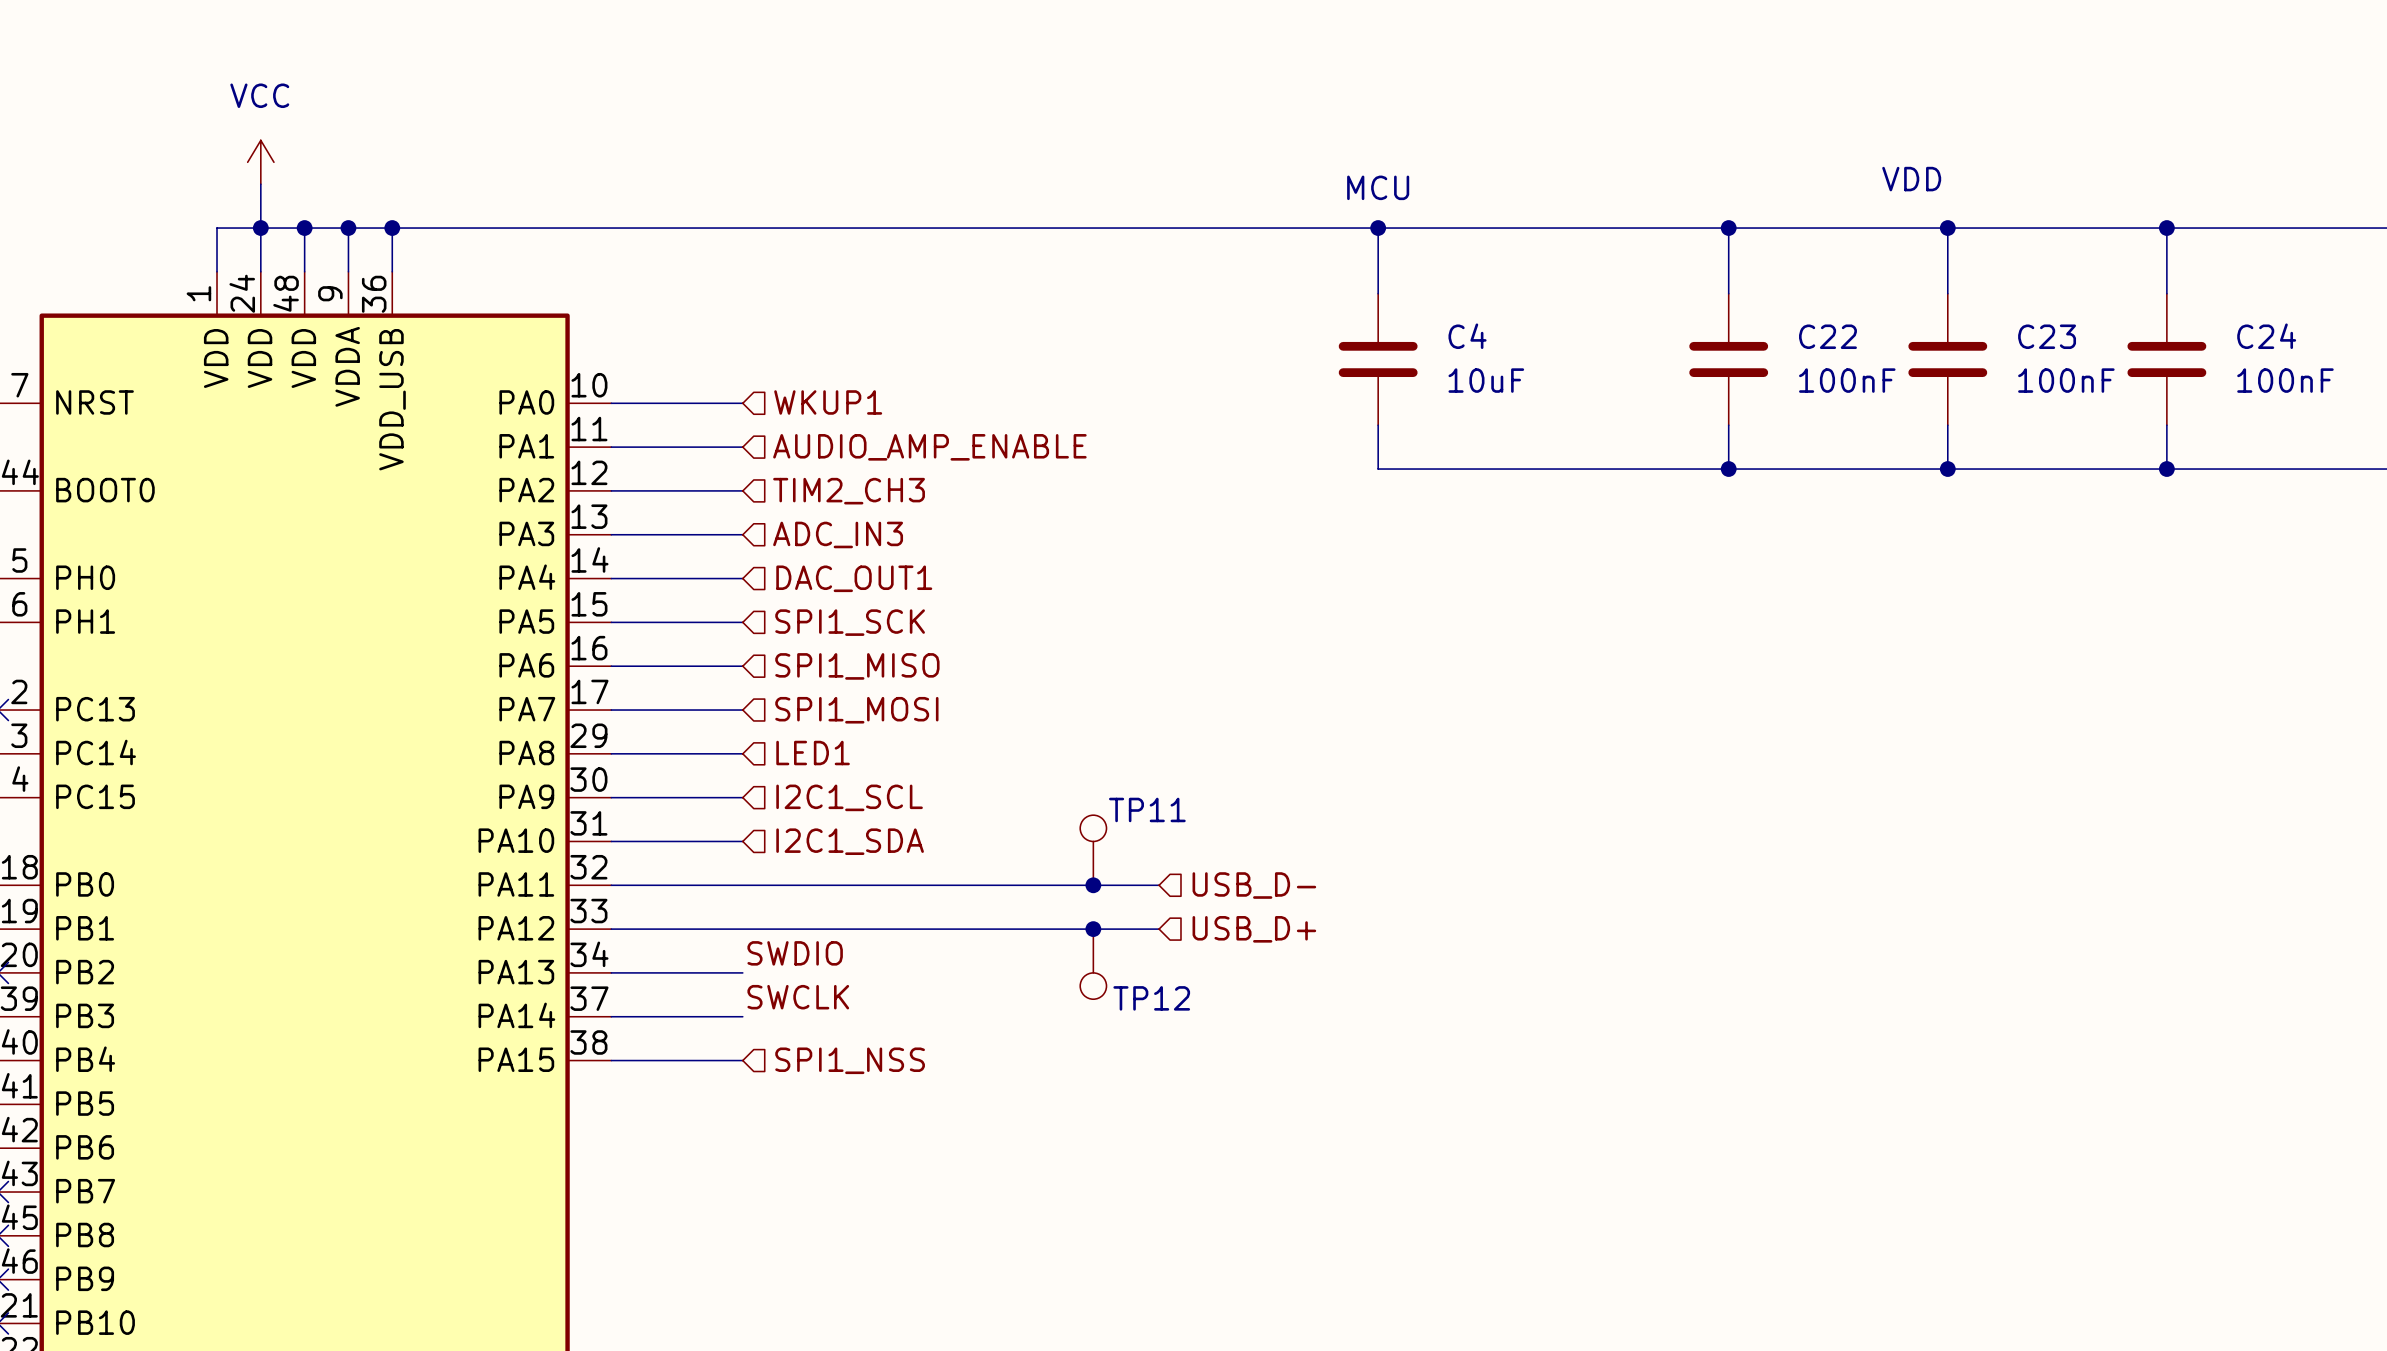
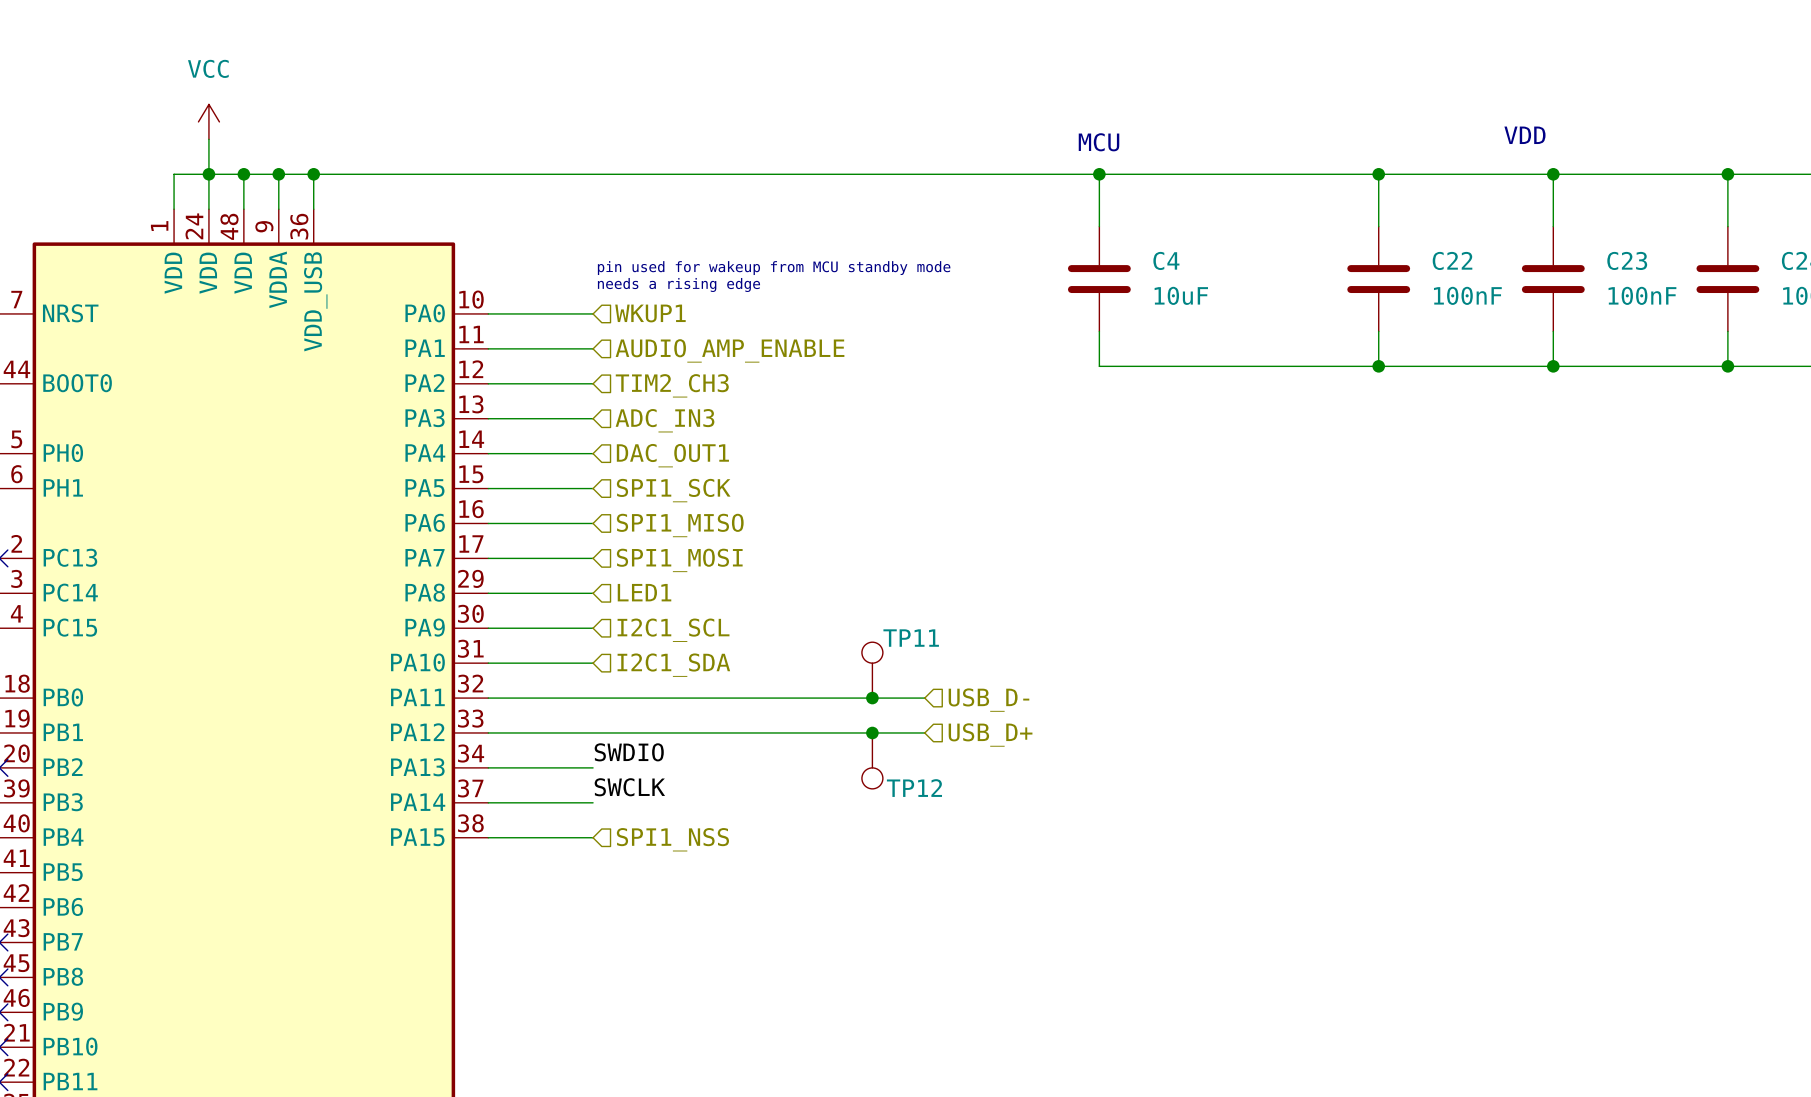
text: none -> pin used for wakeup from MCU standby mode (774, 268)
text: none -> needs a rising edge (678, 284)

